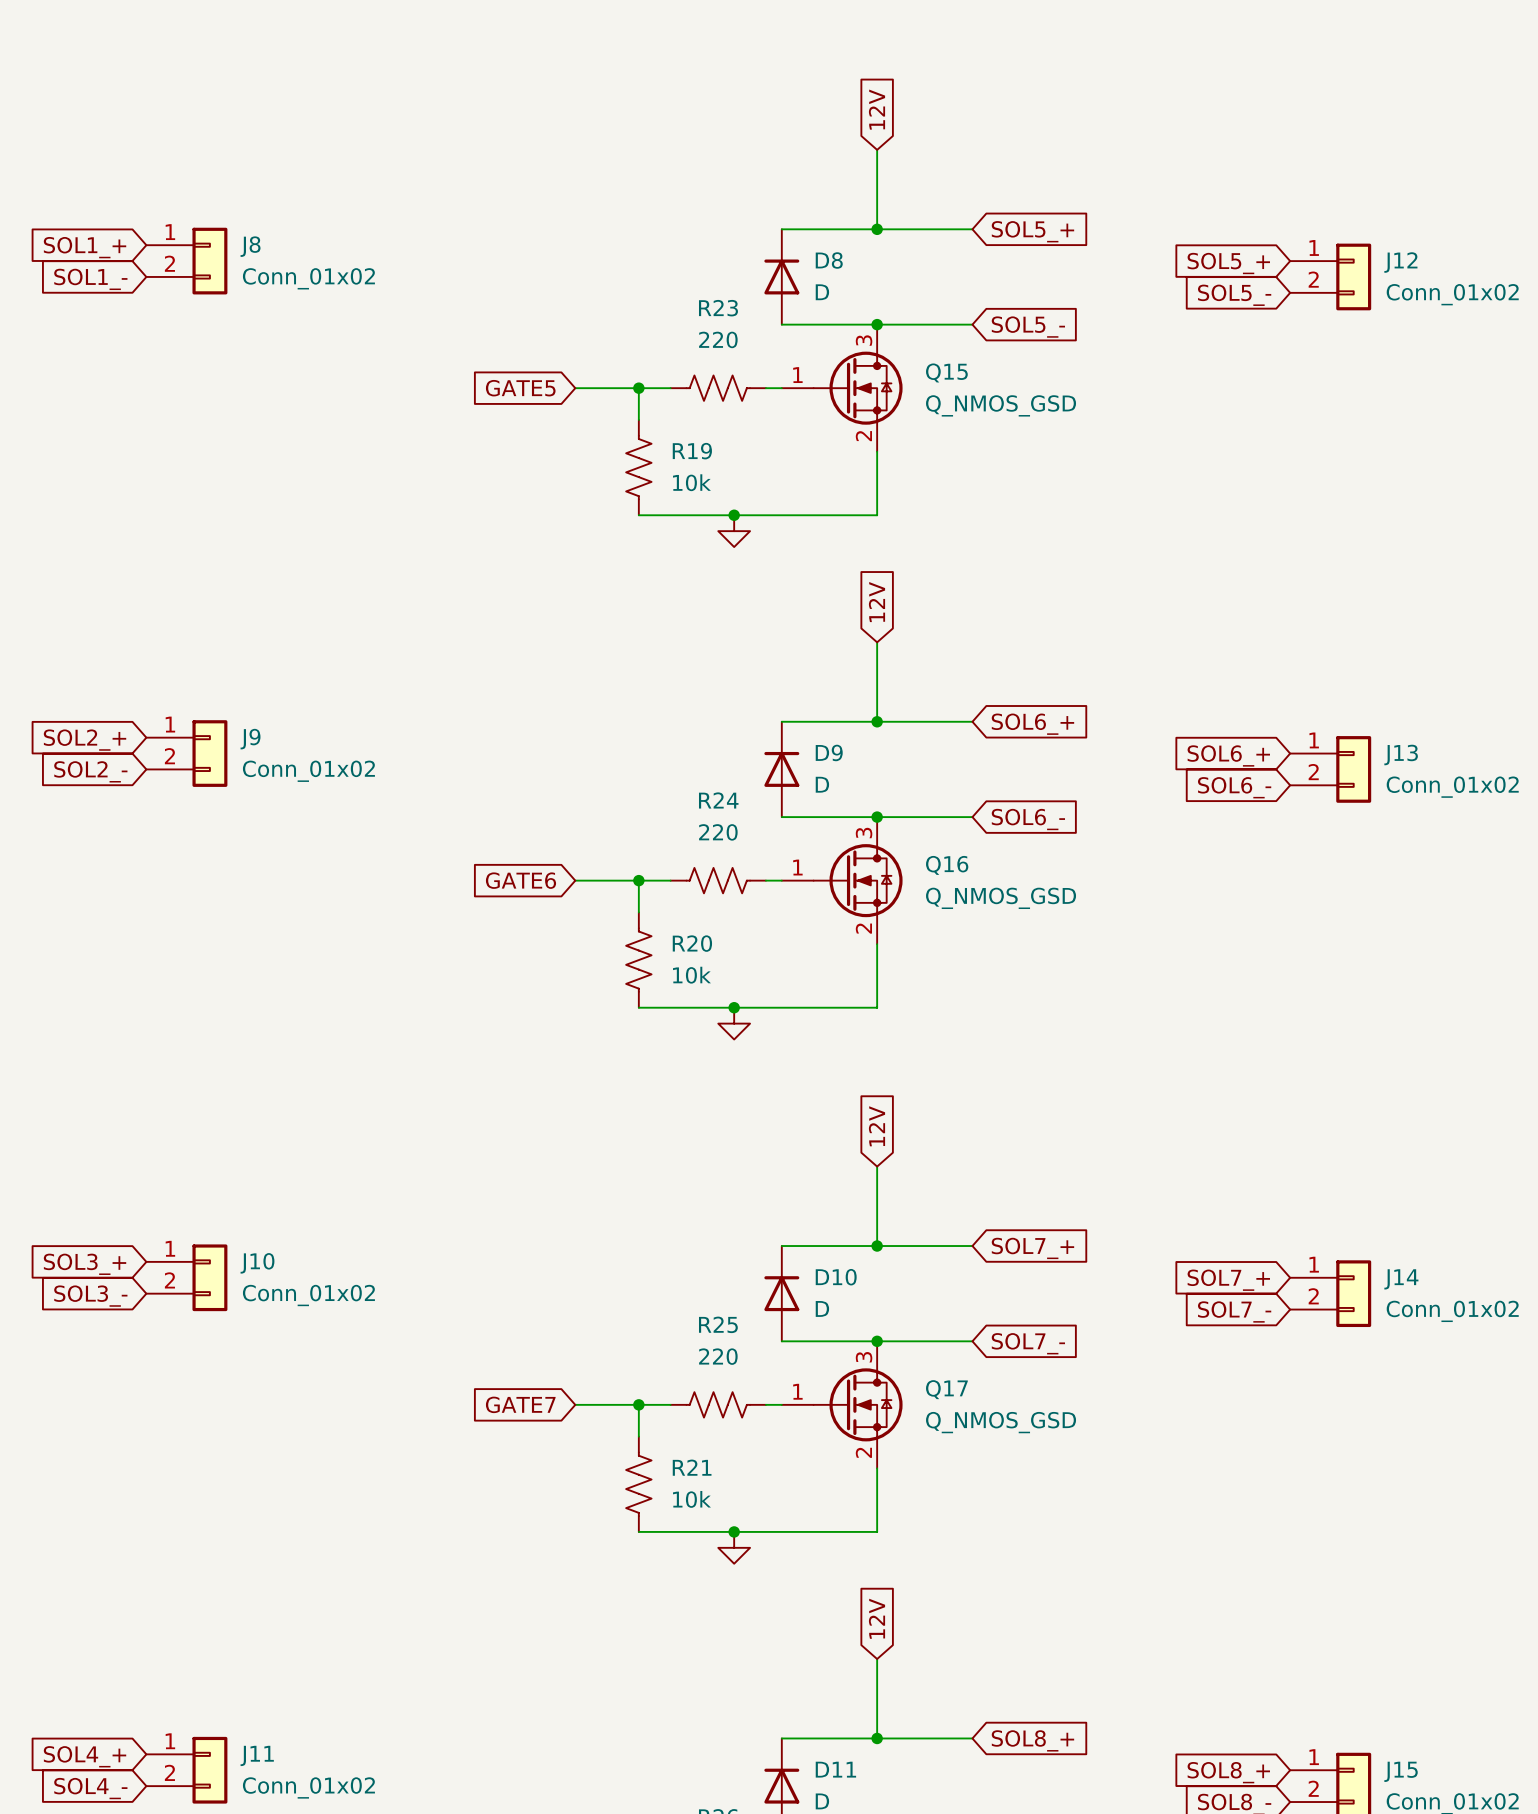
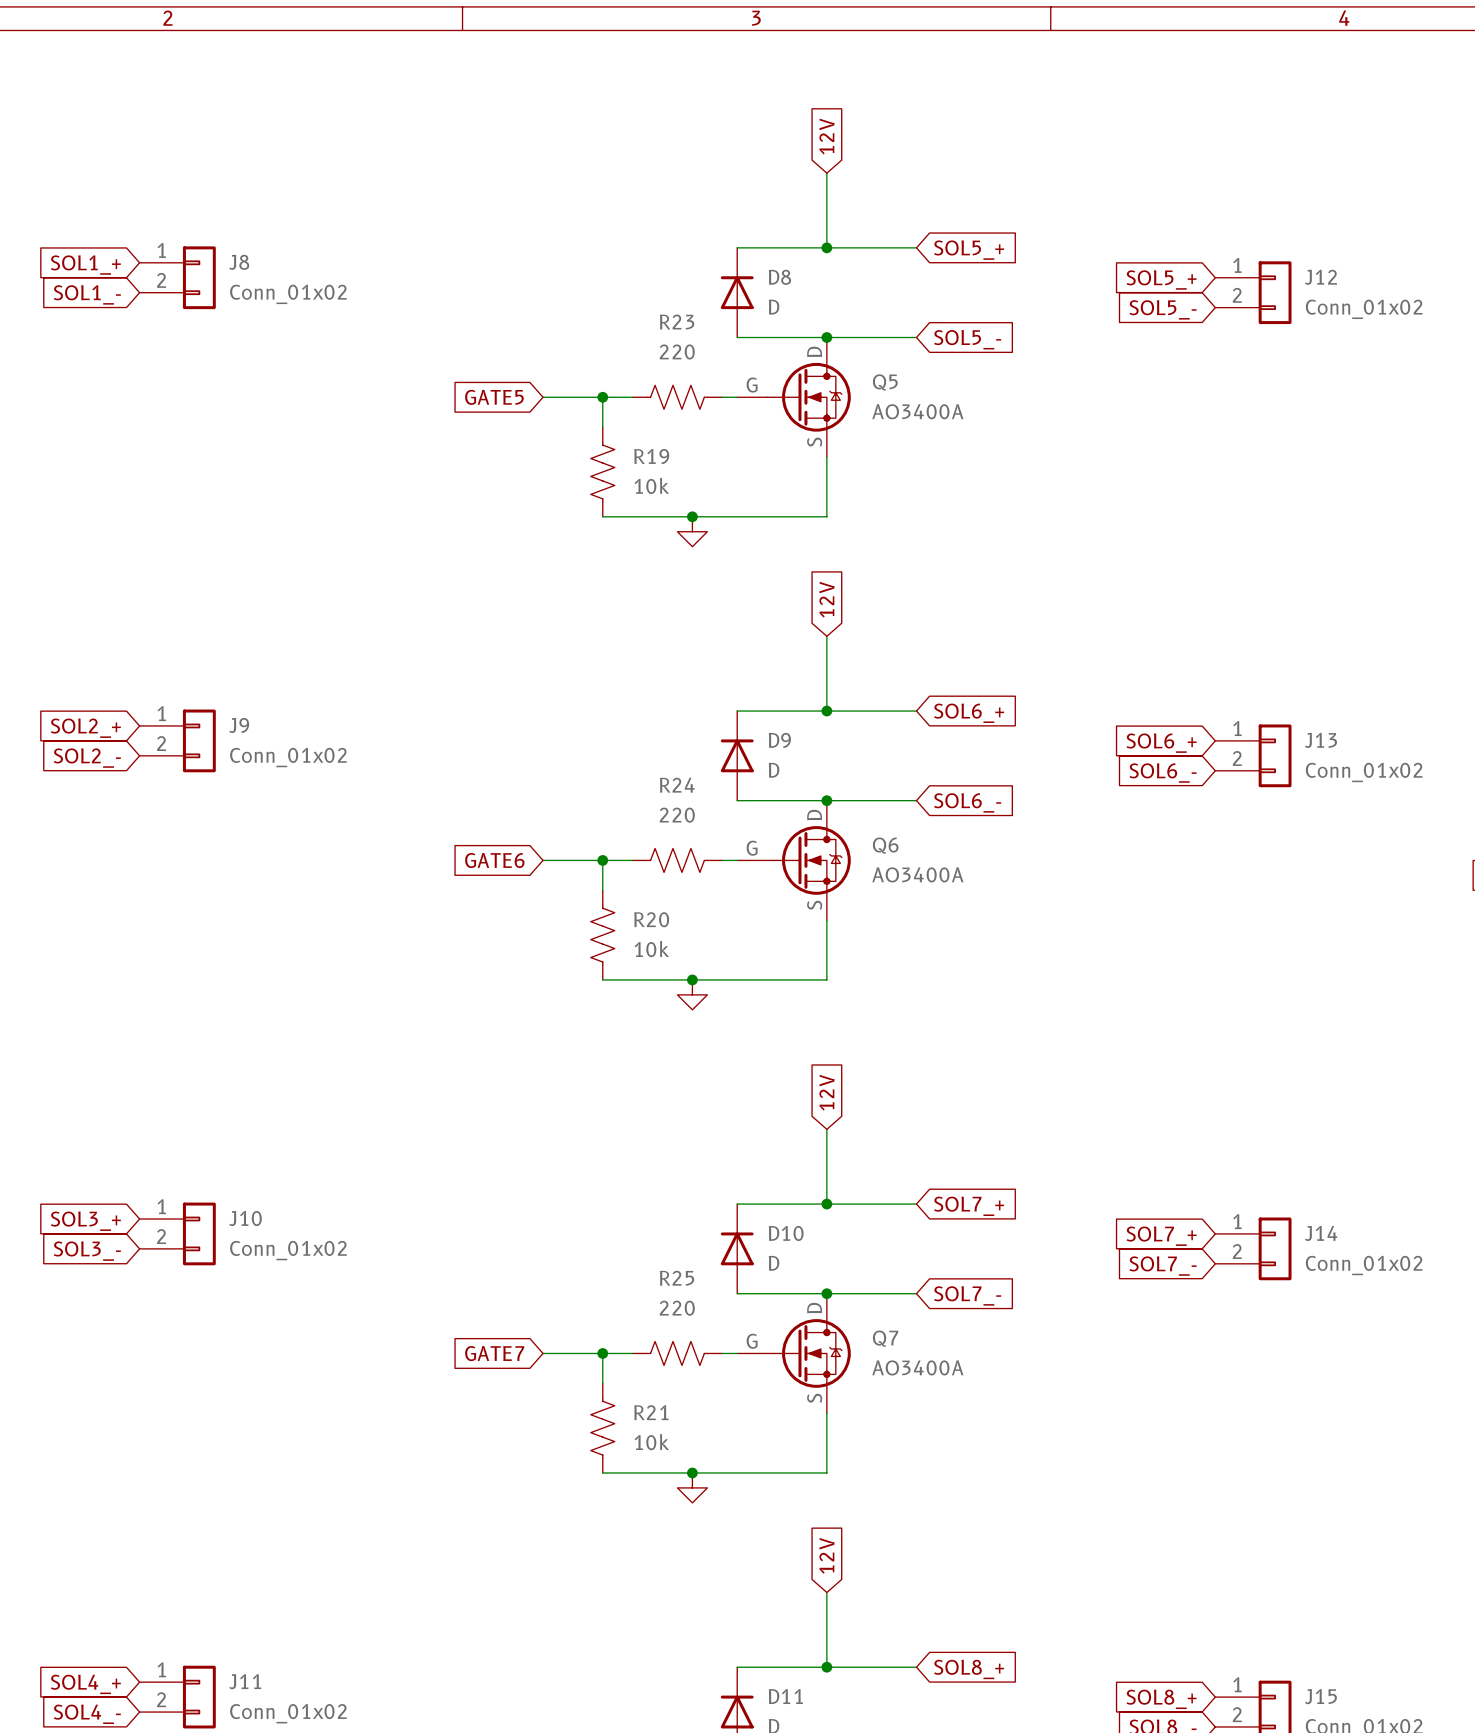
Q15: Q_NMOS_GSD (842, 388) -> none
Q5: none -> AO3400A (794, 397)
Q16: Q_NMOS_GSD (842, 880) -> none
Q6: none -> AO3400A (794, 860)
Q17: Q_NMOS_GSD (842, 1404) -> none
Q7: none -> AO3400A (794, 1353)

